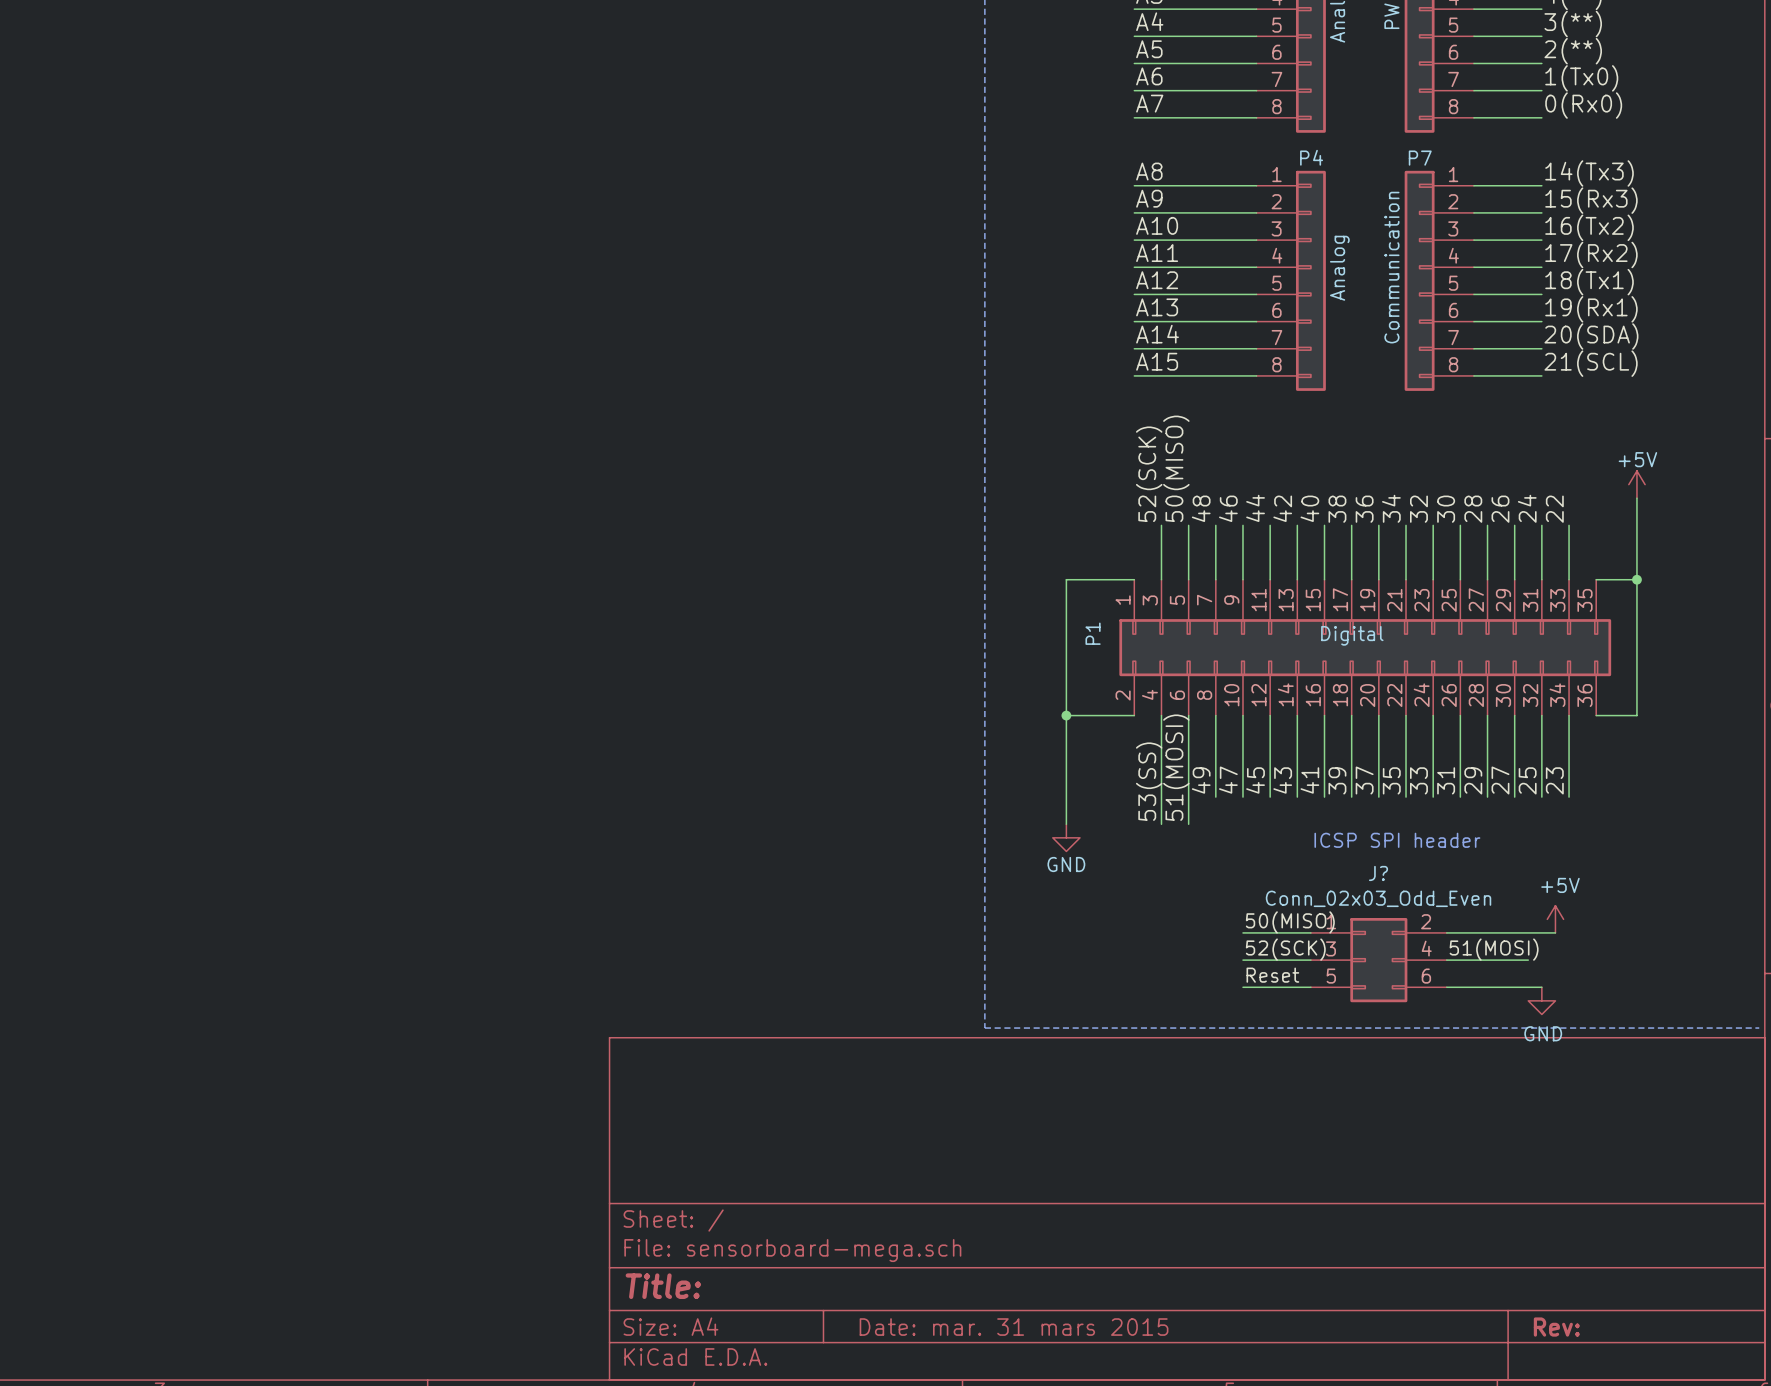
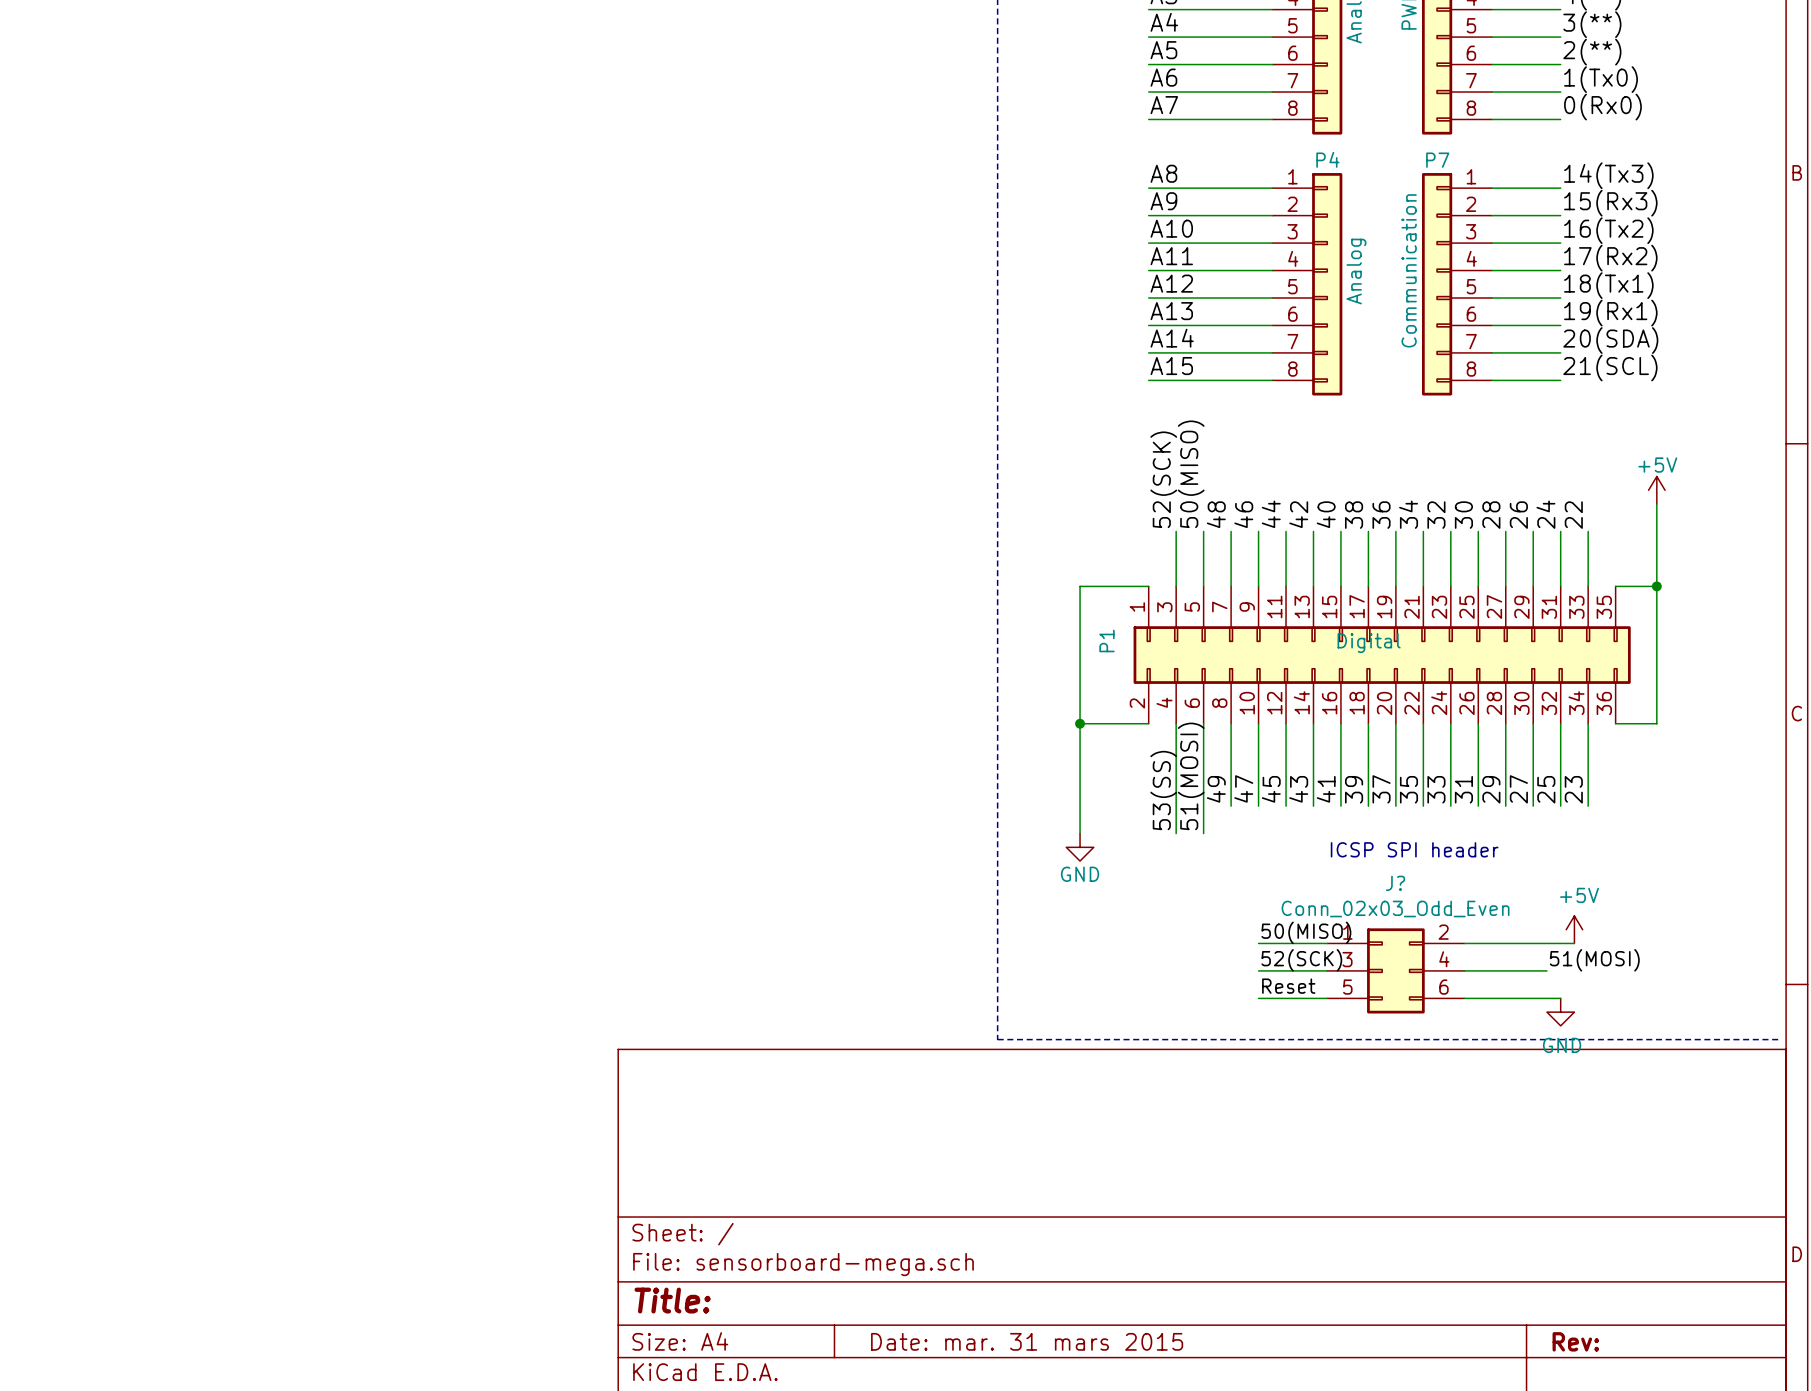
label position: 51(MOSI) (1494, 949) -> 51(MOSI) (1594, 960)

